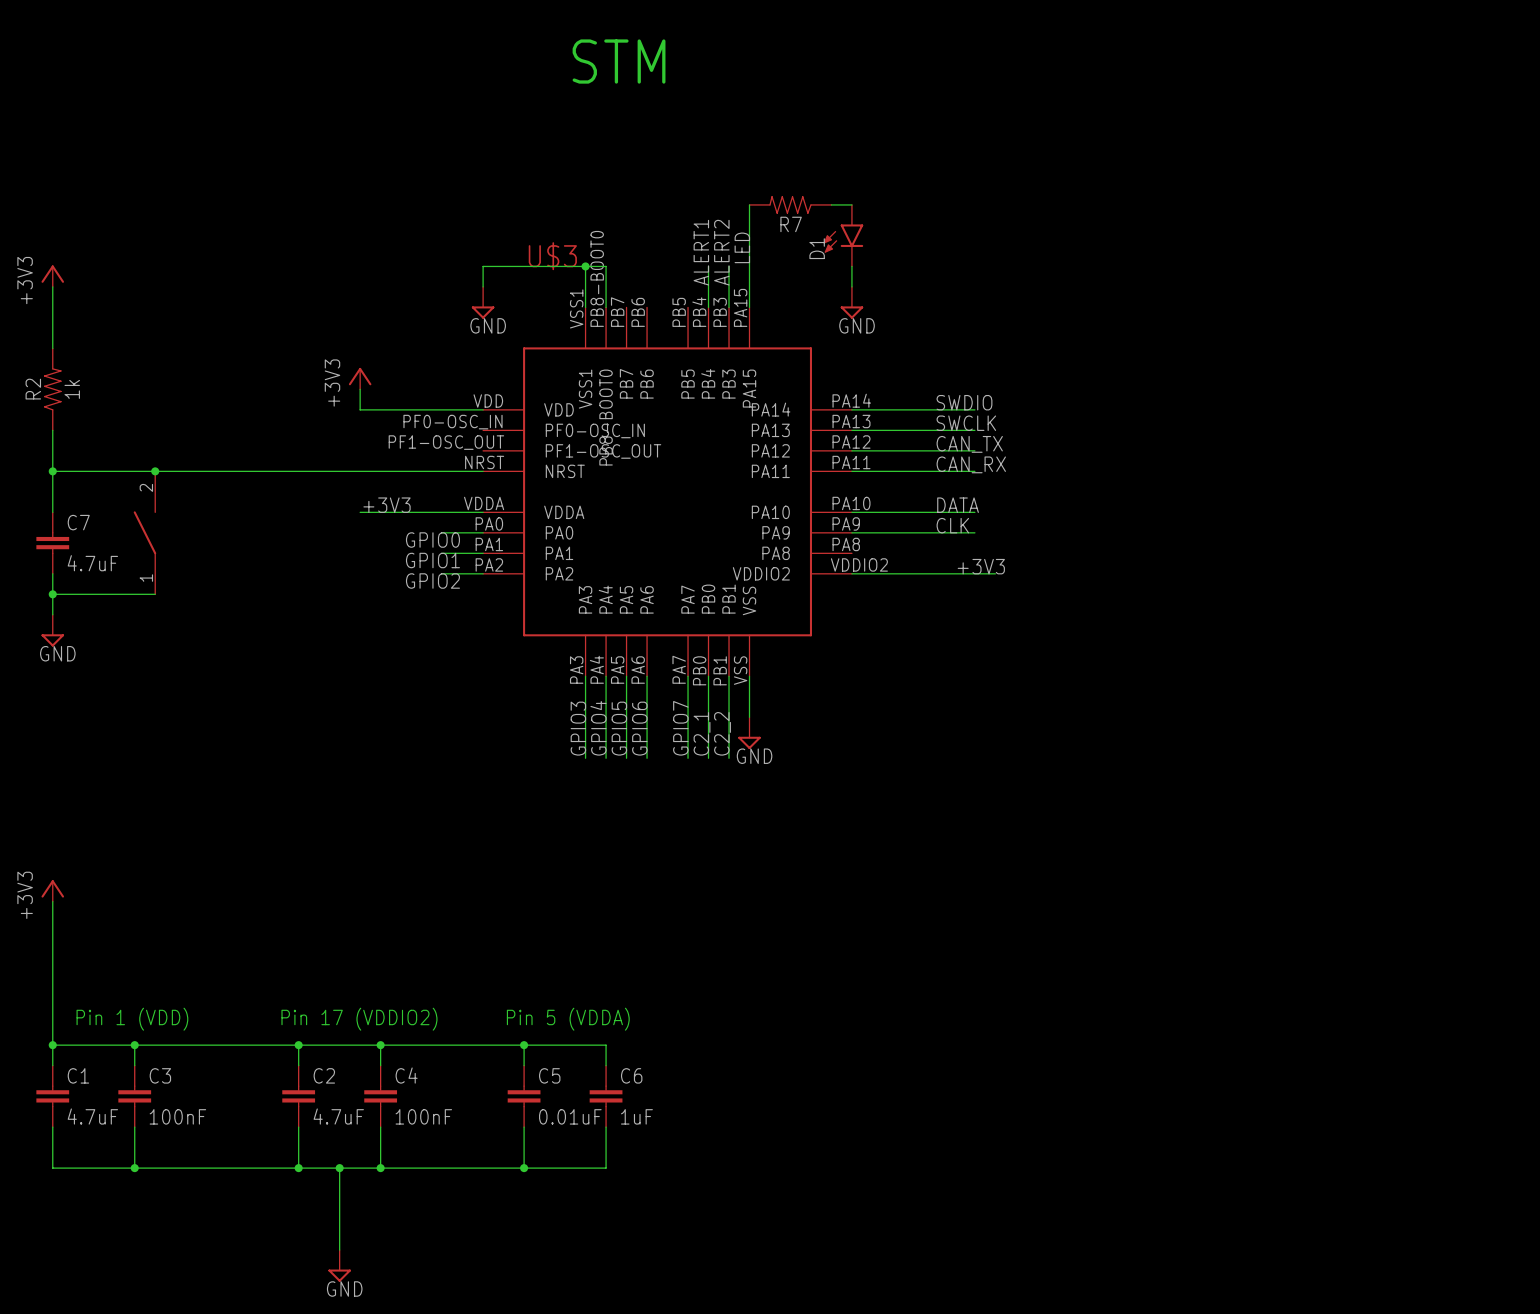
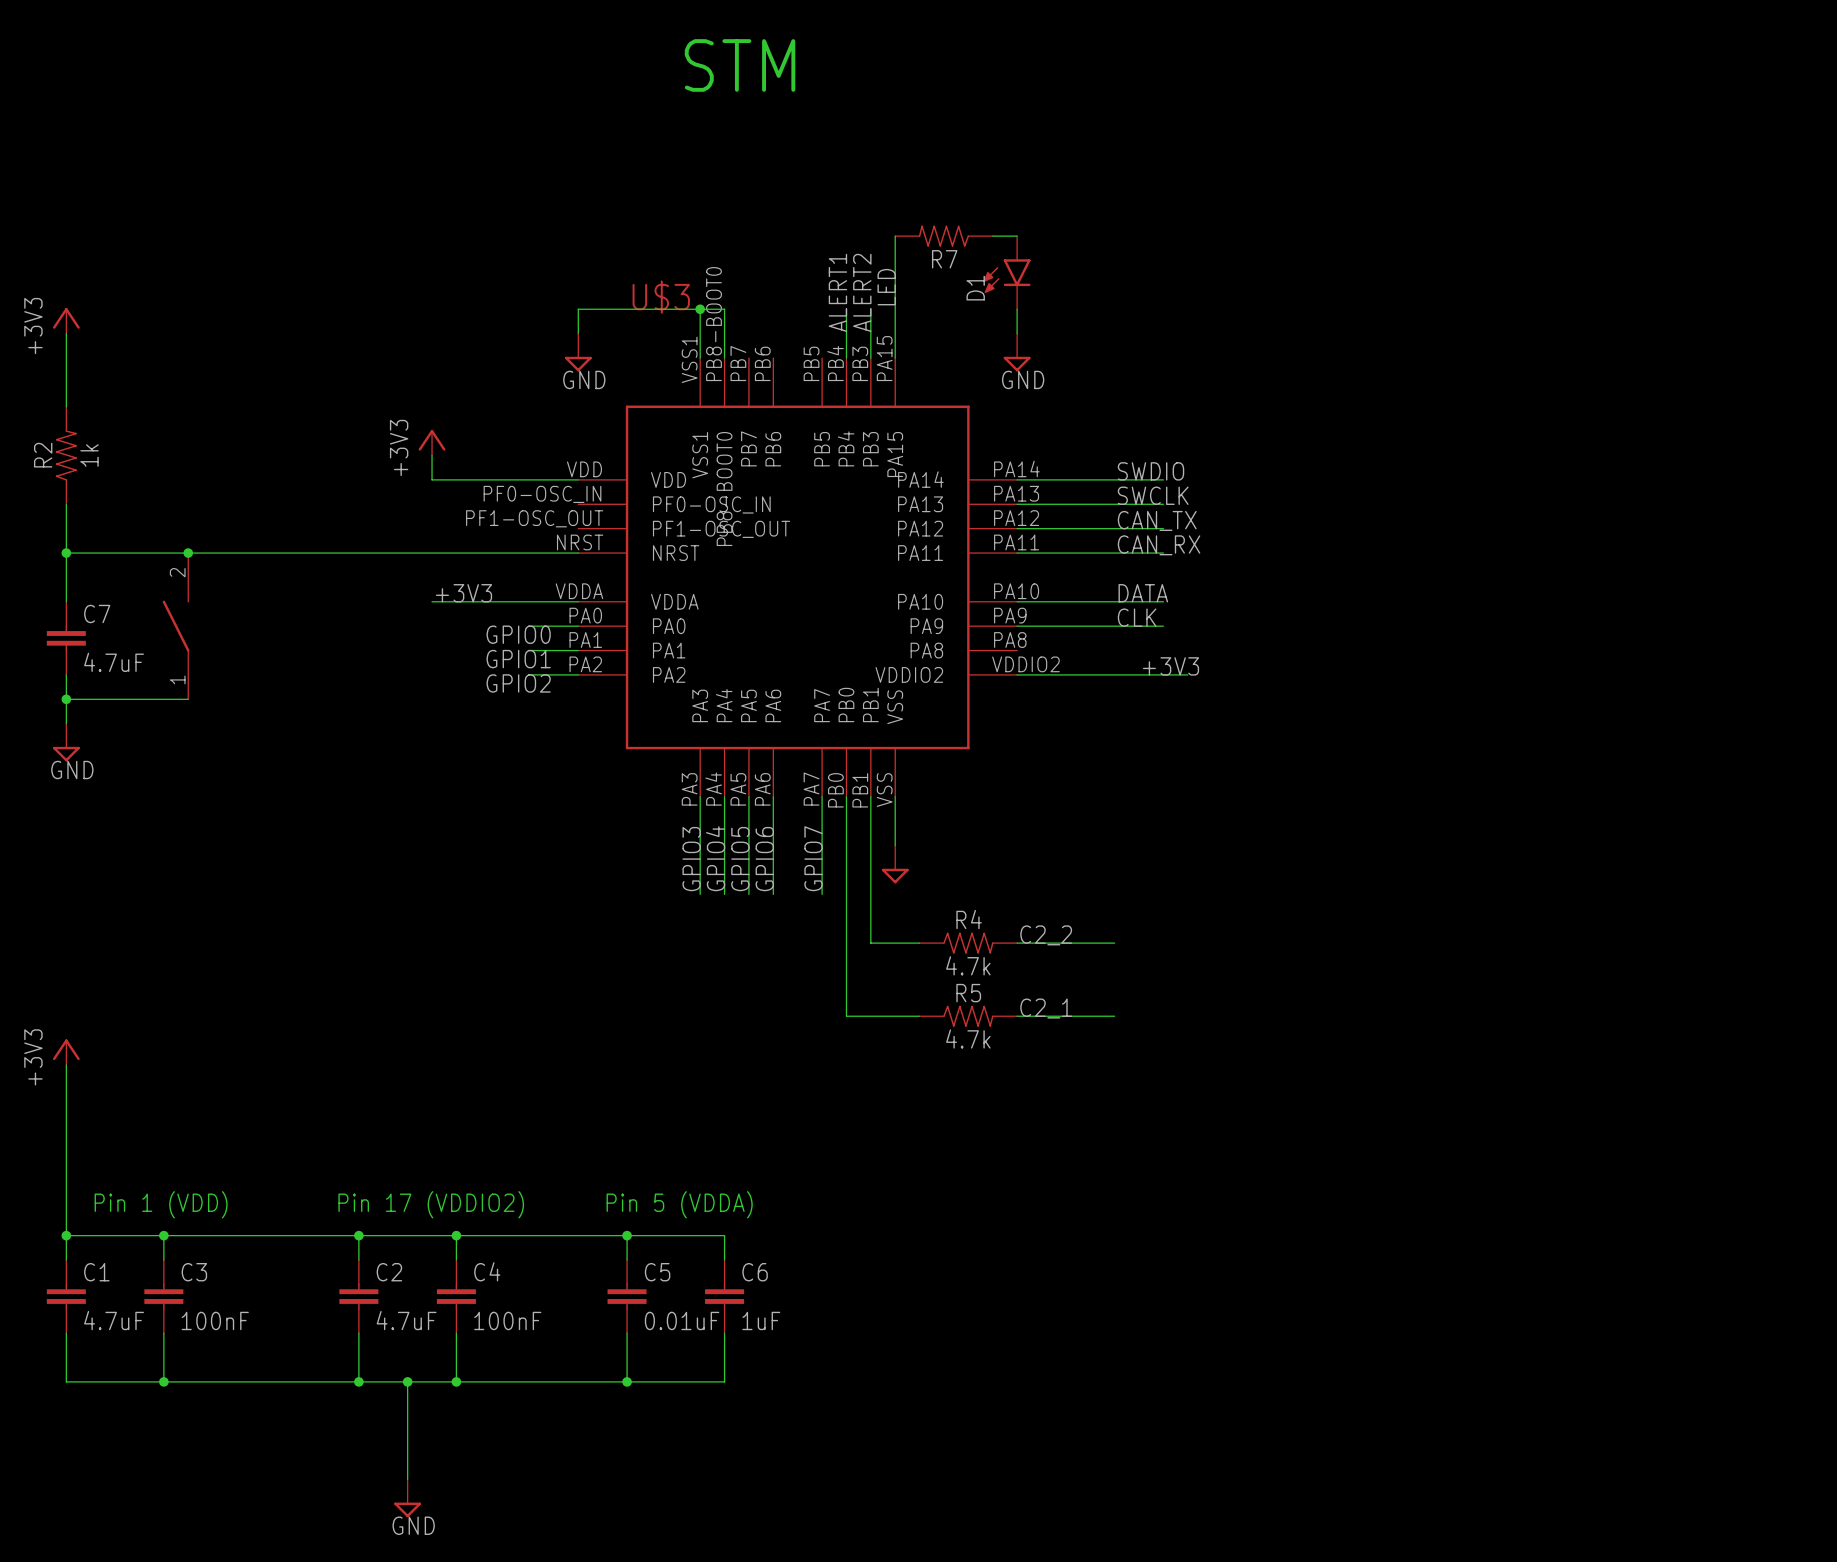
label rotation: 0° (702, 733) -> 90° clockwise (1046, 1008)
label position: C2_1 (702, 733) -> C2_1 (1046, 1008)
label rotation: 0° (722, 733) -> 90° clockwise (1046, 935)
label position: C2_2 (722, 733) -> C2_2 (1046, 935)
power symbol text: GND (754, 756) -> none
wire: none -> (846, 894) (846, 1016) (919, 1016)
wire: none -> (870, 894) (870, 943) (919, 943)
R4: none -> 4.7k (968, 943)
wire: none -> (1017, 943) (1114, 943)
R5: none -> 4.7k (968, 1016)
wire: none -> (1017, 1016) (1114, 1016)

